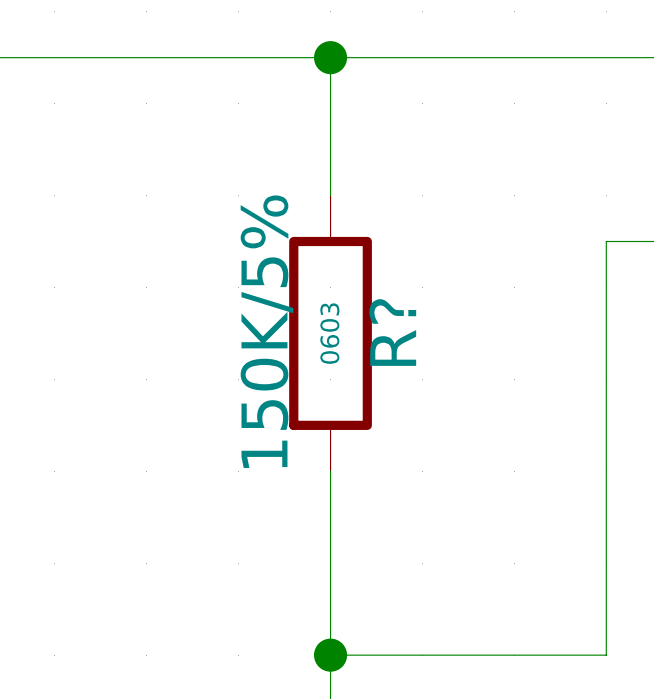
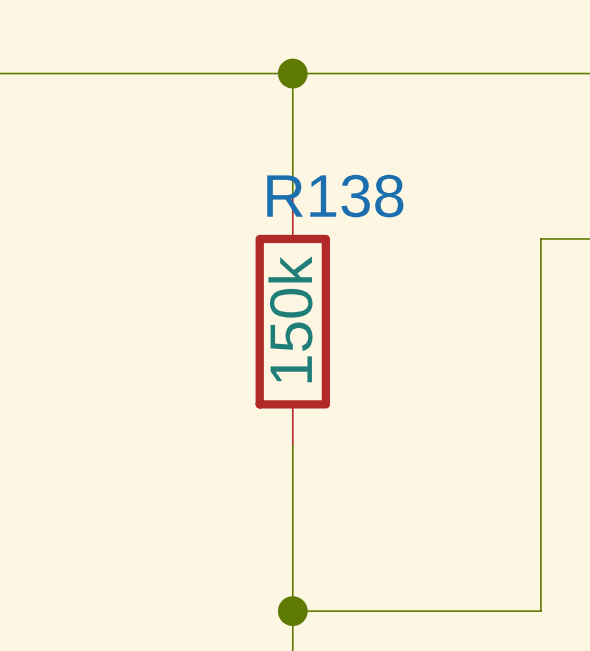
R? value: 150K/5% (266, 331) -> 150k (290, 319)
R? name: R? (392, 332) -> R138 (335, 196)
R? text: 0603 (329, 333) -> none

